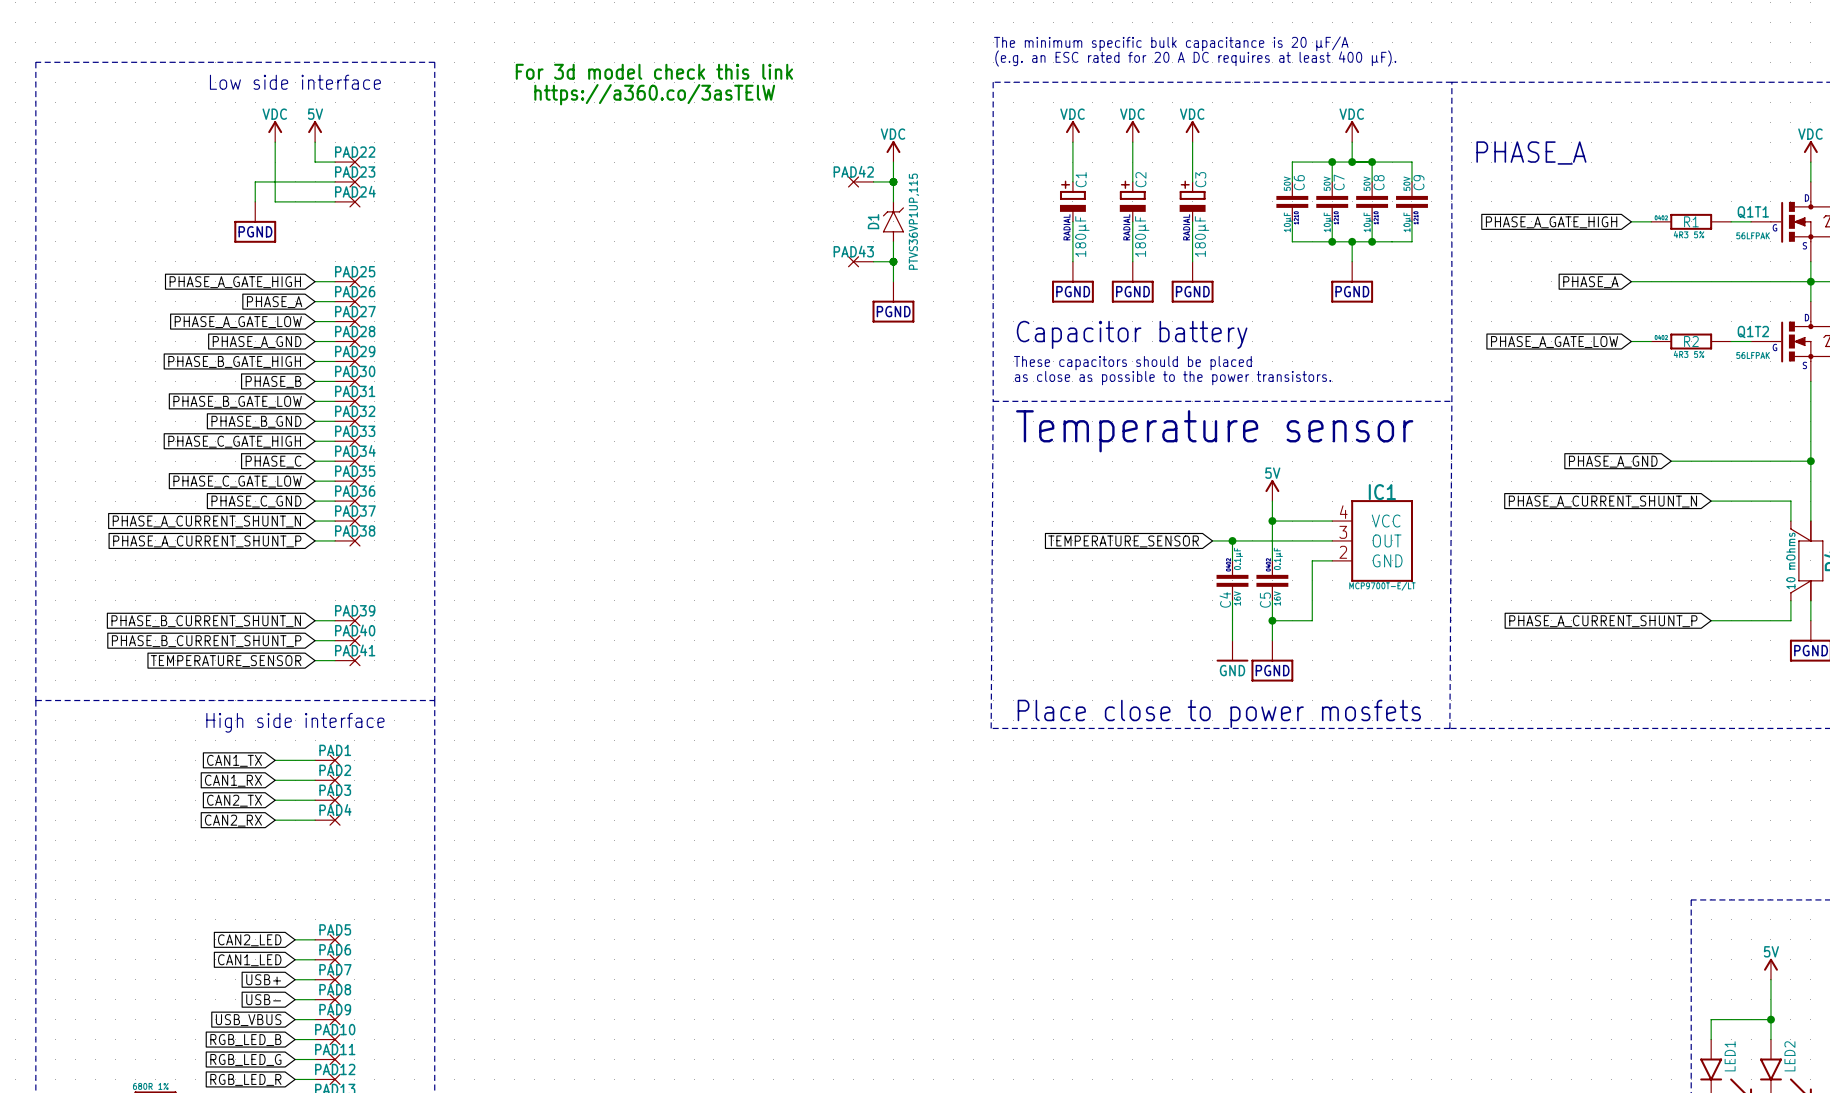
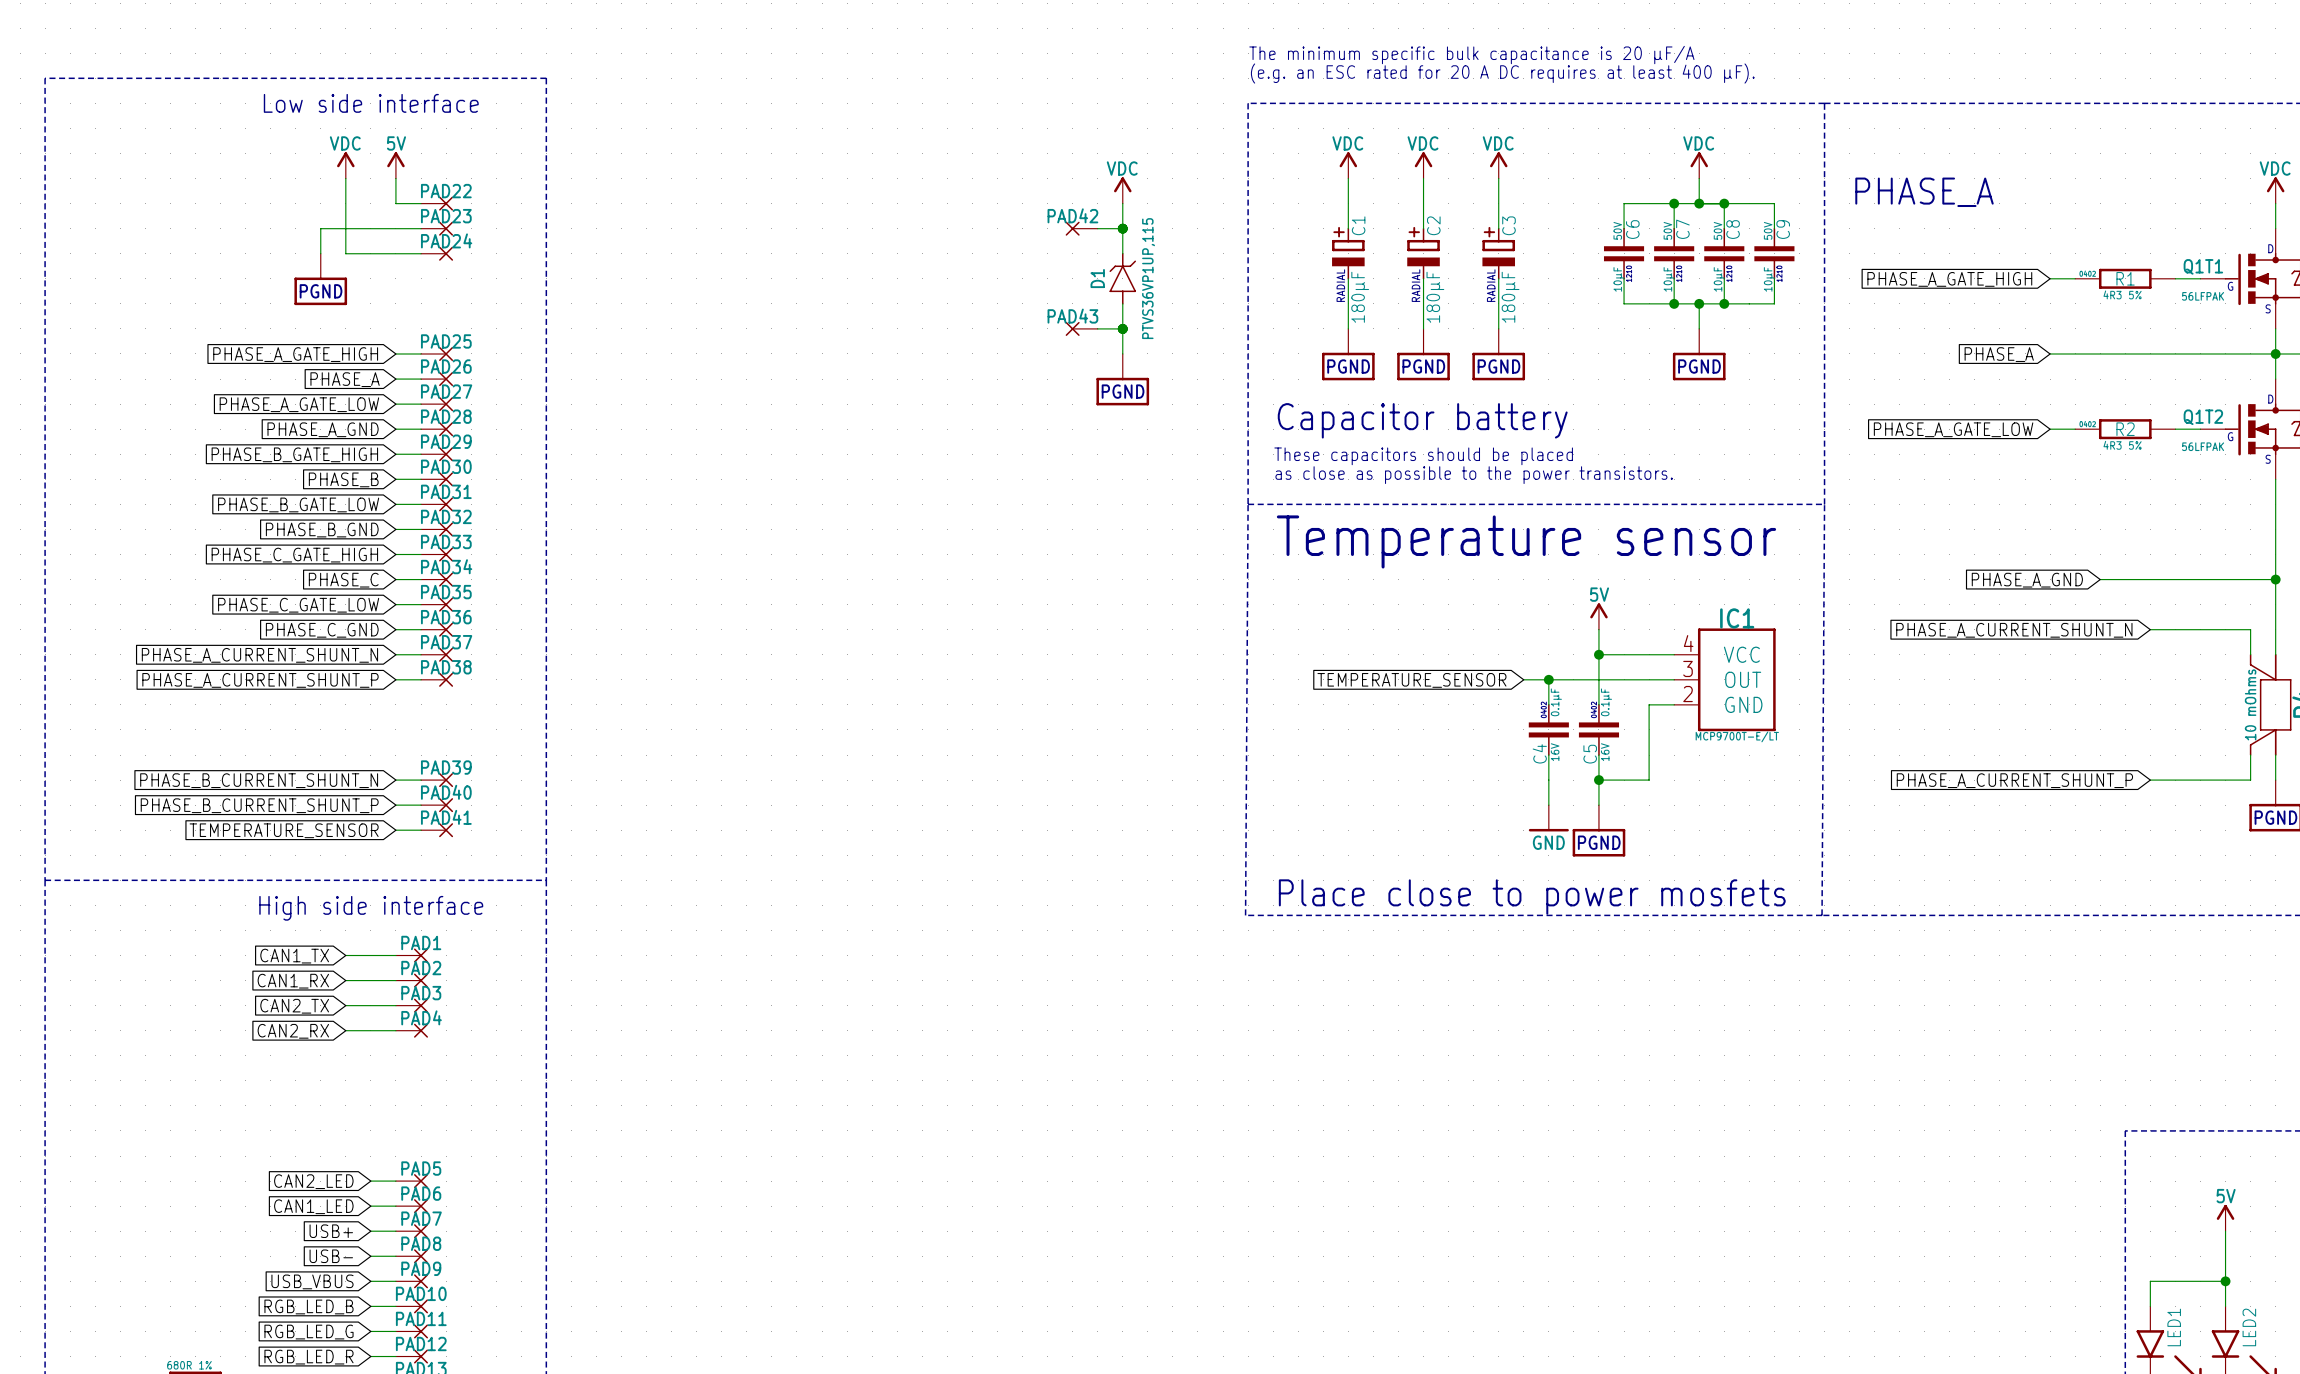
text: For 3d model check this link (654, 71) -> none
text: https://a360.co/3asTElW (654, 94) -> none

